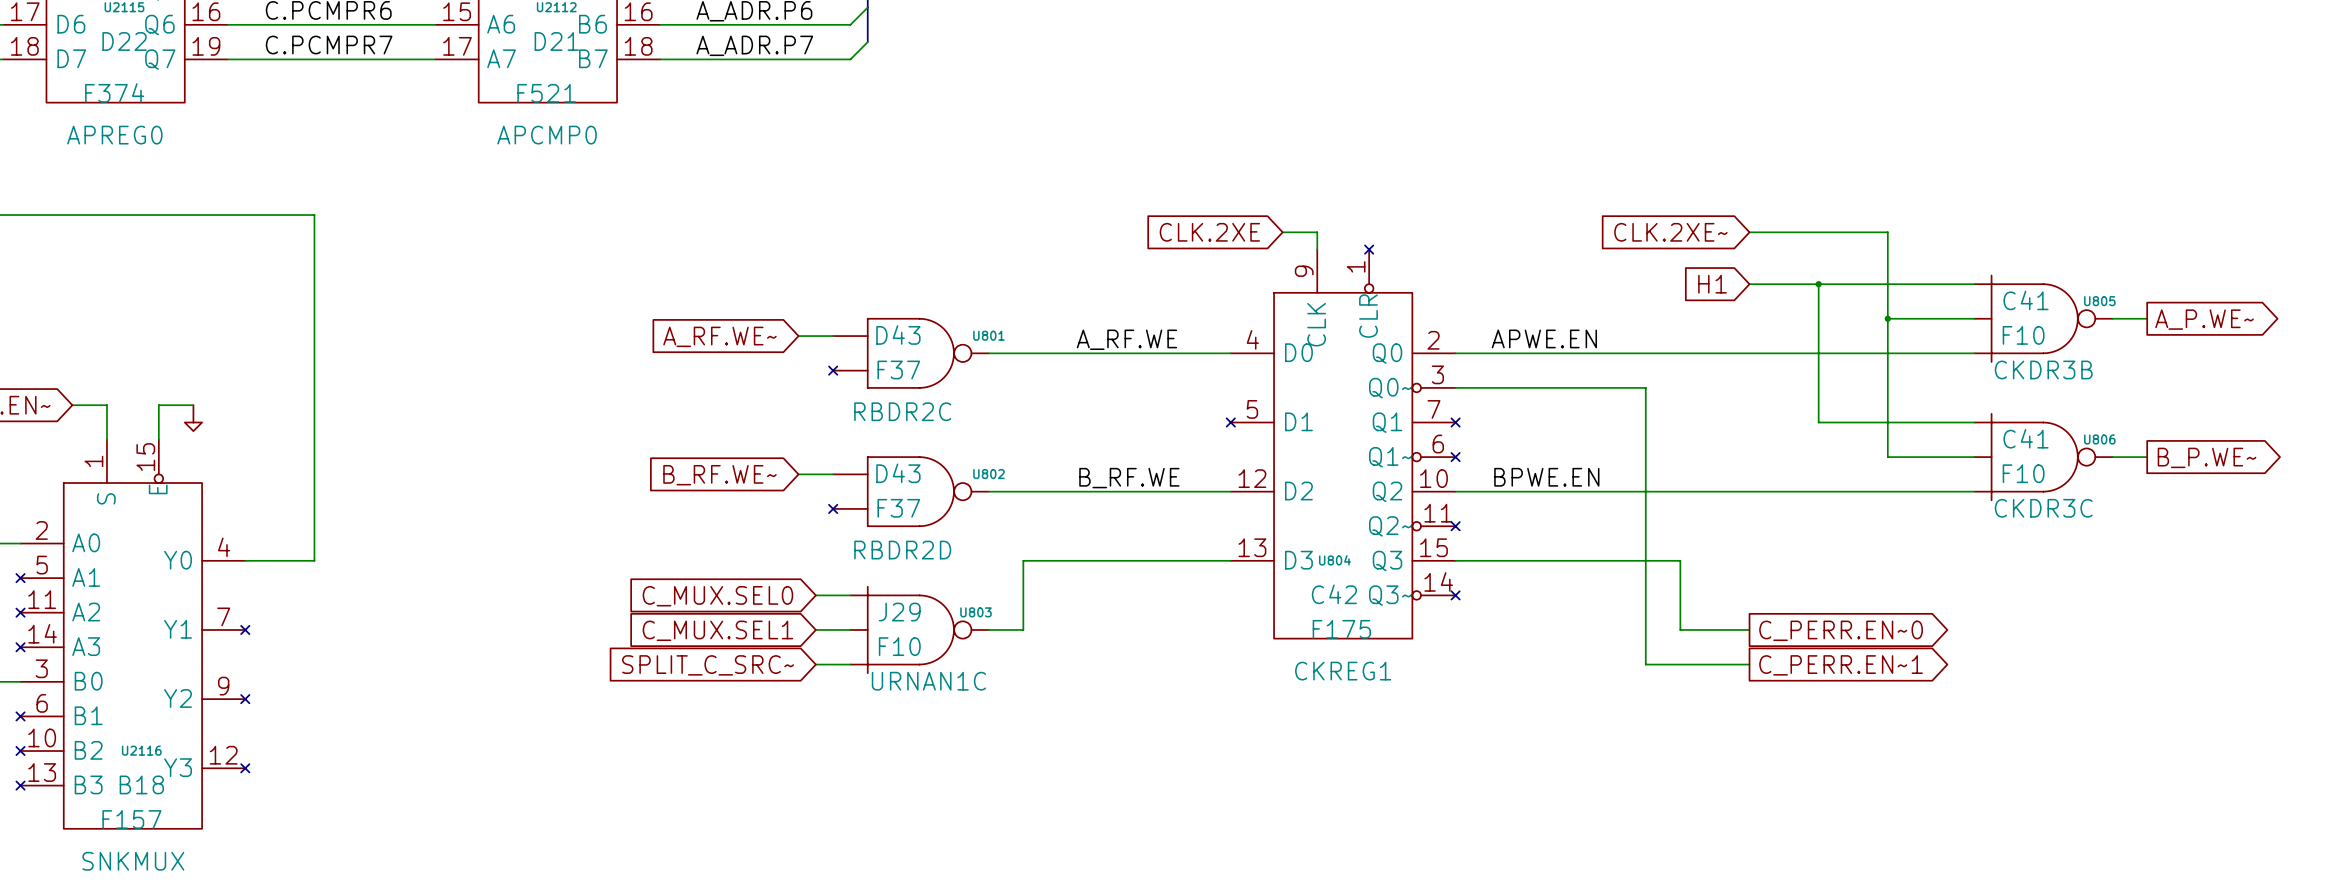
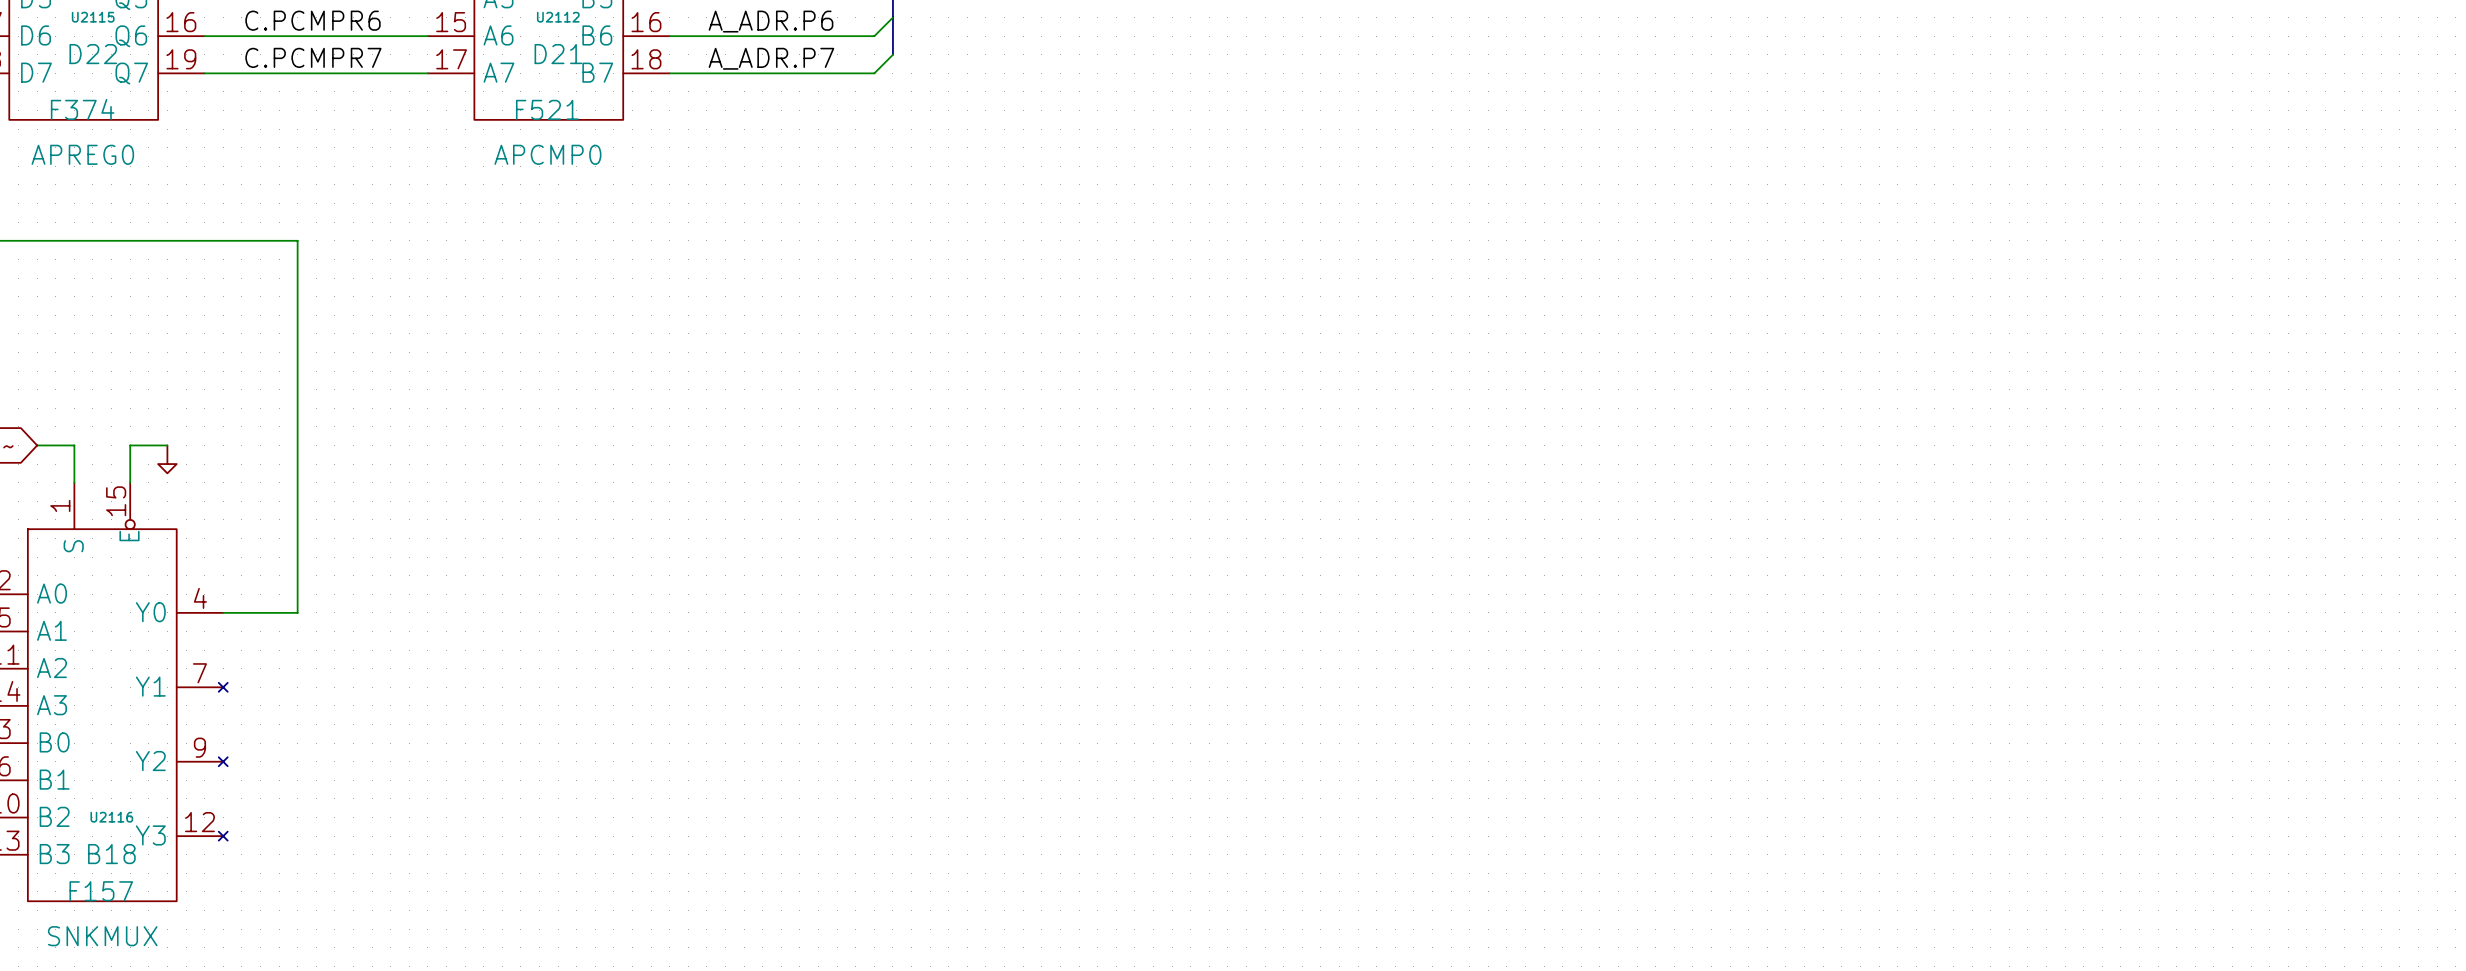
global label: CLK.2XE (1209, 232) -> none
wire: (1282, 232) (1317, 232) (1317, 249) -> none
global label: CLK.2XE~ (1670, 232) -> none
wire: (1749, 232) (1887, 232) (1887, 457) (1974, 457) -> none
no-connect mark: (1369, 249) -> none
global label: H1 (1712, 284) -> none
wire: (1749, 284) (1974, 284) -> none
wire: (1818, 284) (1818, 422) (1974, 422) -> none
junction: (1818, 284) -> none
wire: (1887, 318) (1974, 318) -> none
junction: (1887, 318) -> none
U805: F10 (2043, 318) -> none
wire: (2112, 318) (2147, 318) -> none
global label: A_P.WE~ (2204, 319) -> none
global label: A_RF.WE~ (719, 336) -> none
wire: (798, 336) (833, 336) -> none
label: APWE.EN (1544, 338) -> none
label: A_RF.WE (1126, 339) -> none
U801: F37 (910, 353) -> none
wire: (988, 353) (1230, 353) -> none
wire: (1455, 353) (1974, 353) -> none
no-connect mark: (833, 370) -> none
wire: (1455, 387) (1645, 387) (1645, 664) (1749, 664) -> none
no-connect mark: (1230, 422) -> none
no-connect mark: (1455, 422) -> none
U804: F175 (1343, 444) -> none
no-connect mark: (1455, 457) -> none
U806: F10 (2043, 457) -> none
wire: (2112, 457) (2147, 457) -> none
global label: B_P.WE~ (2207, 457) -> none
wire: (798, 474) (833, 474) -> none
global label: B_RF.WE~ (719, 475) -> none
label: BPWE.EN (1546, 477) -> none
label: B_RF.WE (1129, 478) -> none
U802: F37 (910, 491) -> none
wire: (988, 491) (1230, 491) -> none
wire: (1455, 491) (1974, 491) -> none
no-connect mark: (833, 508) -> none
no-connect mark: (1455, 526) -> none
wire: (1230, 560) (1023, 560) (1023, 629) (988, 629) -> none
wire: (1455, 560) (1680, 560) (1680, 629) (1749, 629) -> none
wire: (815, 595) (850, 595) -> none
no-connect mark: (1455, 595) -> none
global label: C_MUX.SEL0 (717, 596) -> none
wire: (815, 629) (850, 629) -> none
U803: F10 (919, 629) -> none
global label: C_MUX.SEL1 (717, 630) -> none
global label: C_PERR.EN~0 (1841, 630) -> none
wire: (815, 664) (850, 664) -> none
global label: SPLIT_C_SRC~ (708, 665) -> none
global label: C_PERR.EN~1 (1841, 665) -> none

